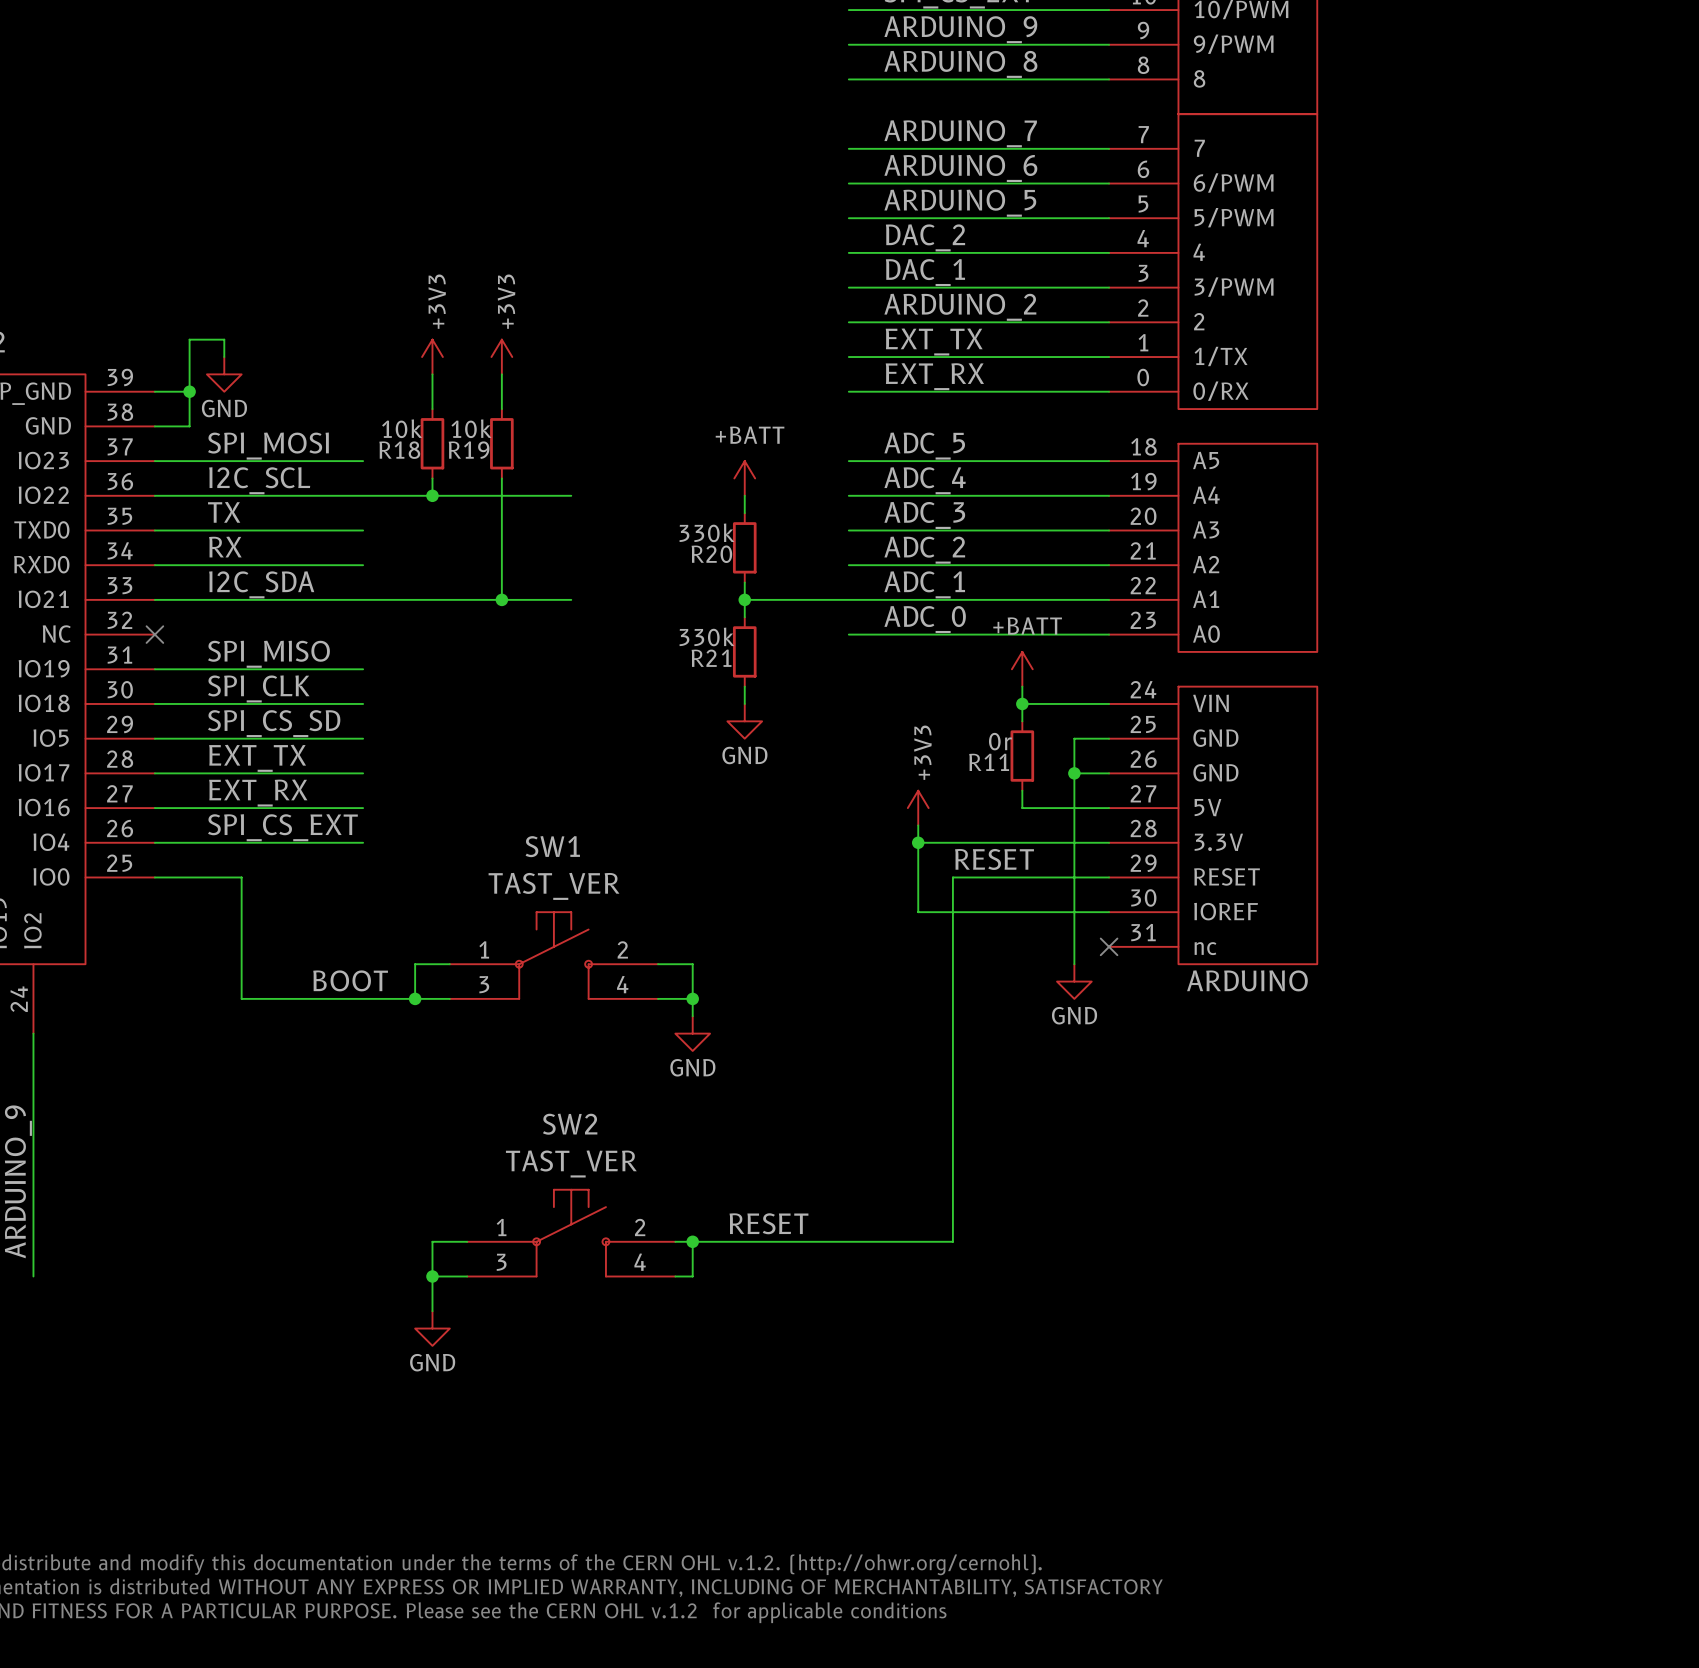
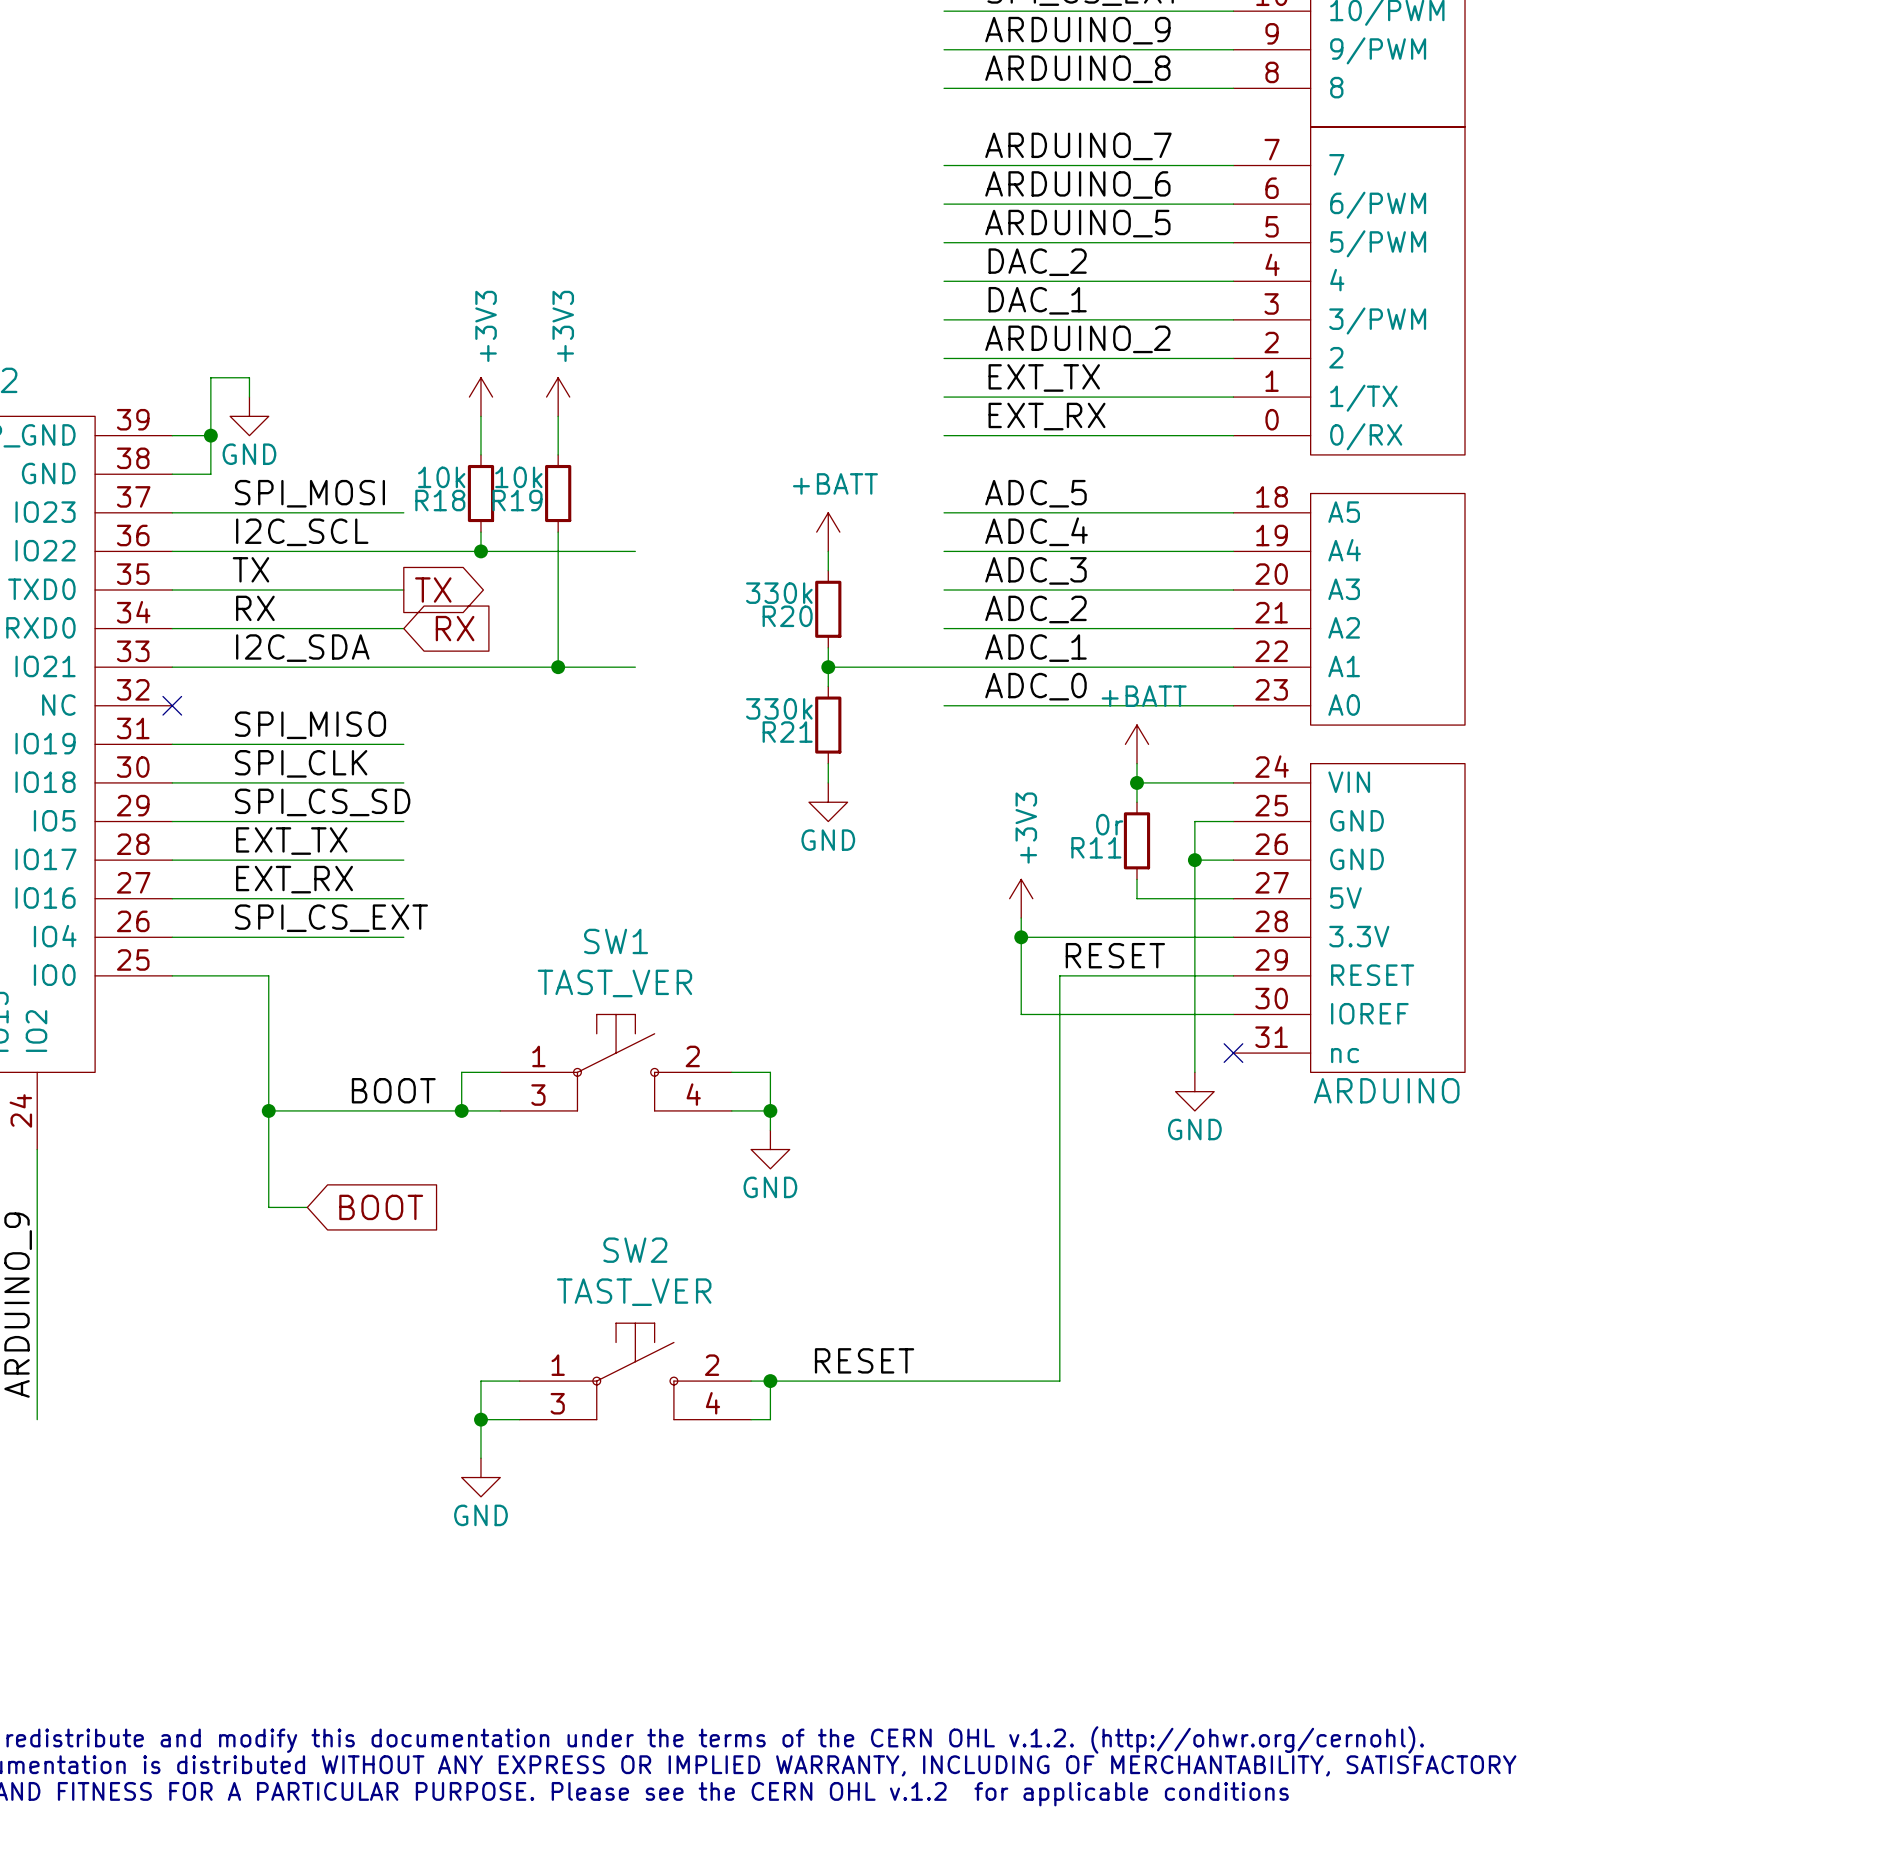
global label: none -> TX (433, 590)
global label: none -> RX (455, 628)
wire: none -> (268, 1110) (268, 1207) (307, 1207)
junction: none -> (268, 1110)
global label: none -> BOOT (381, 1207)

